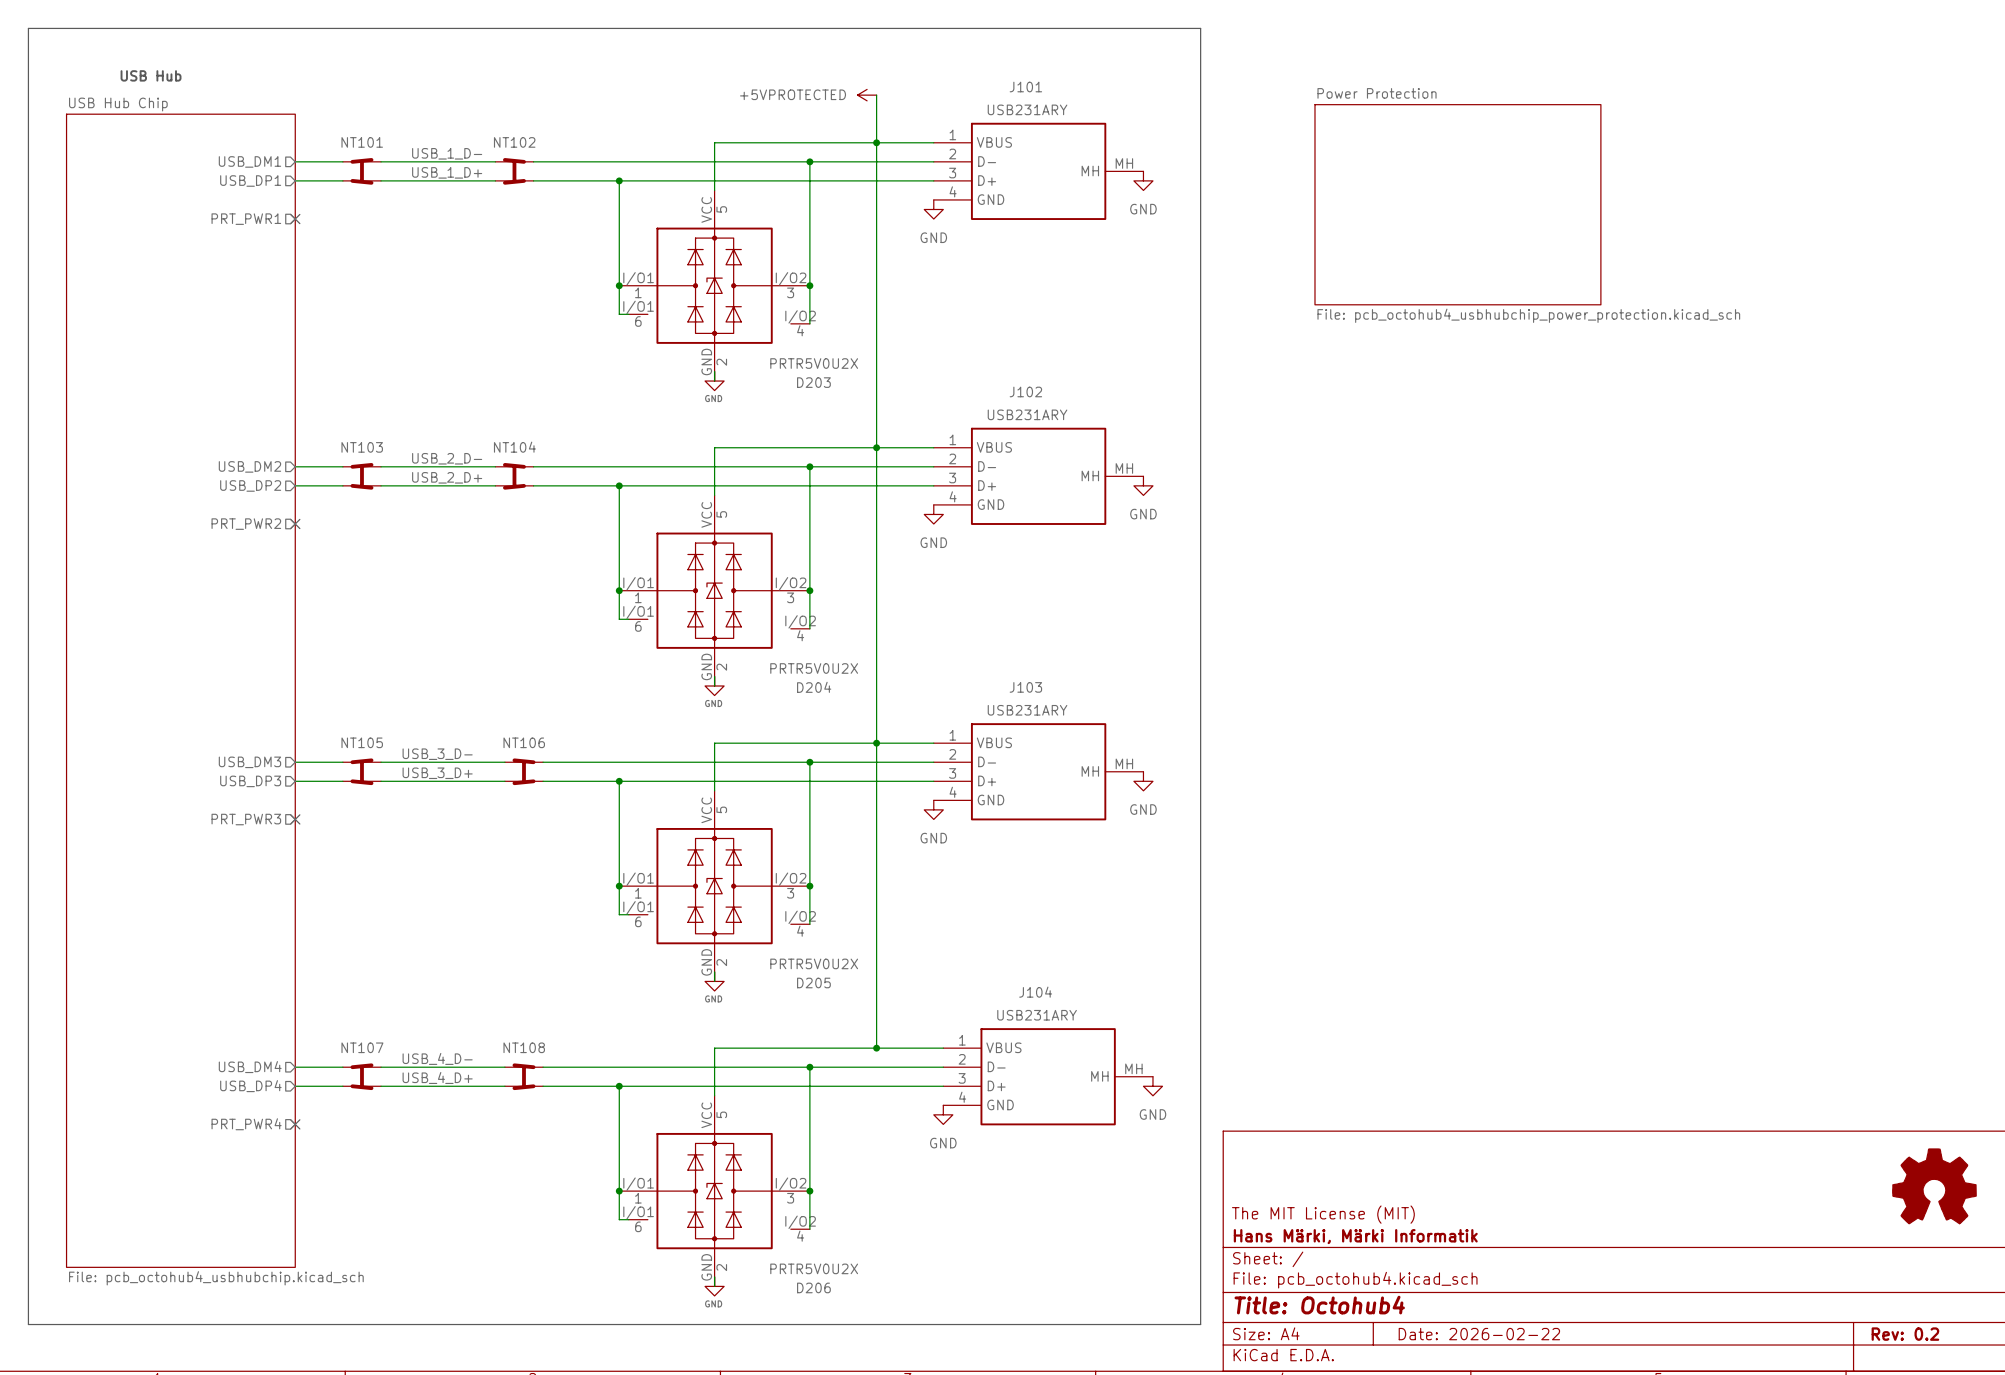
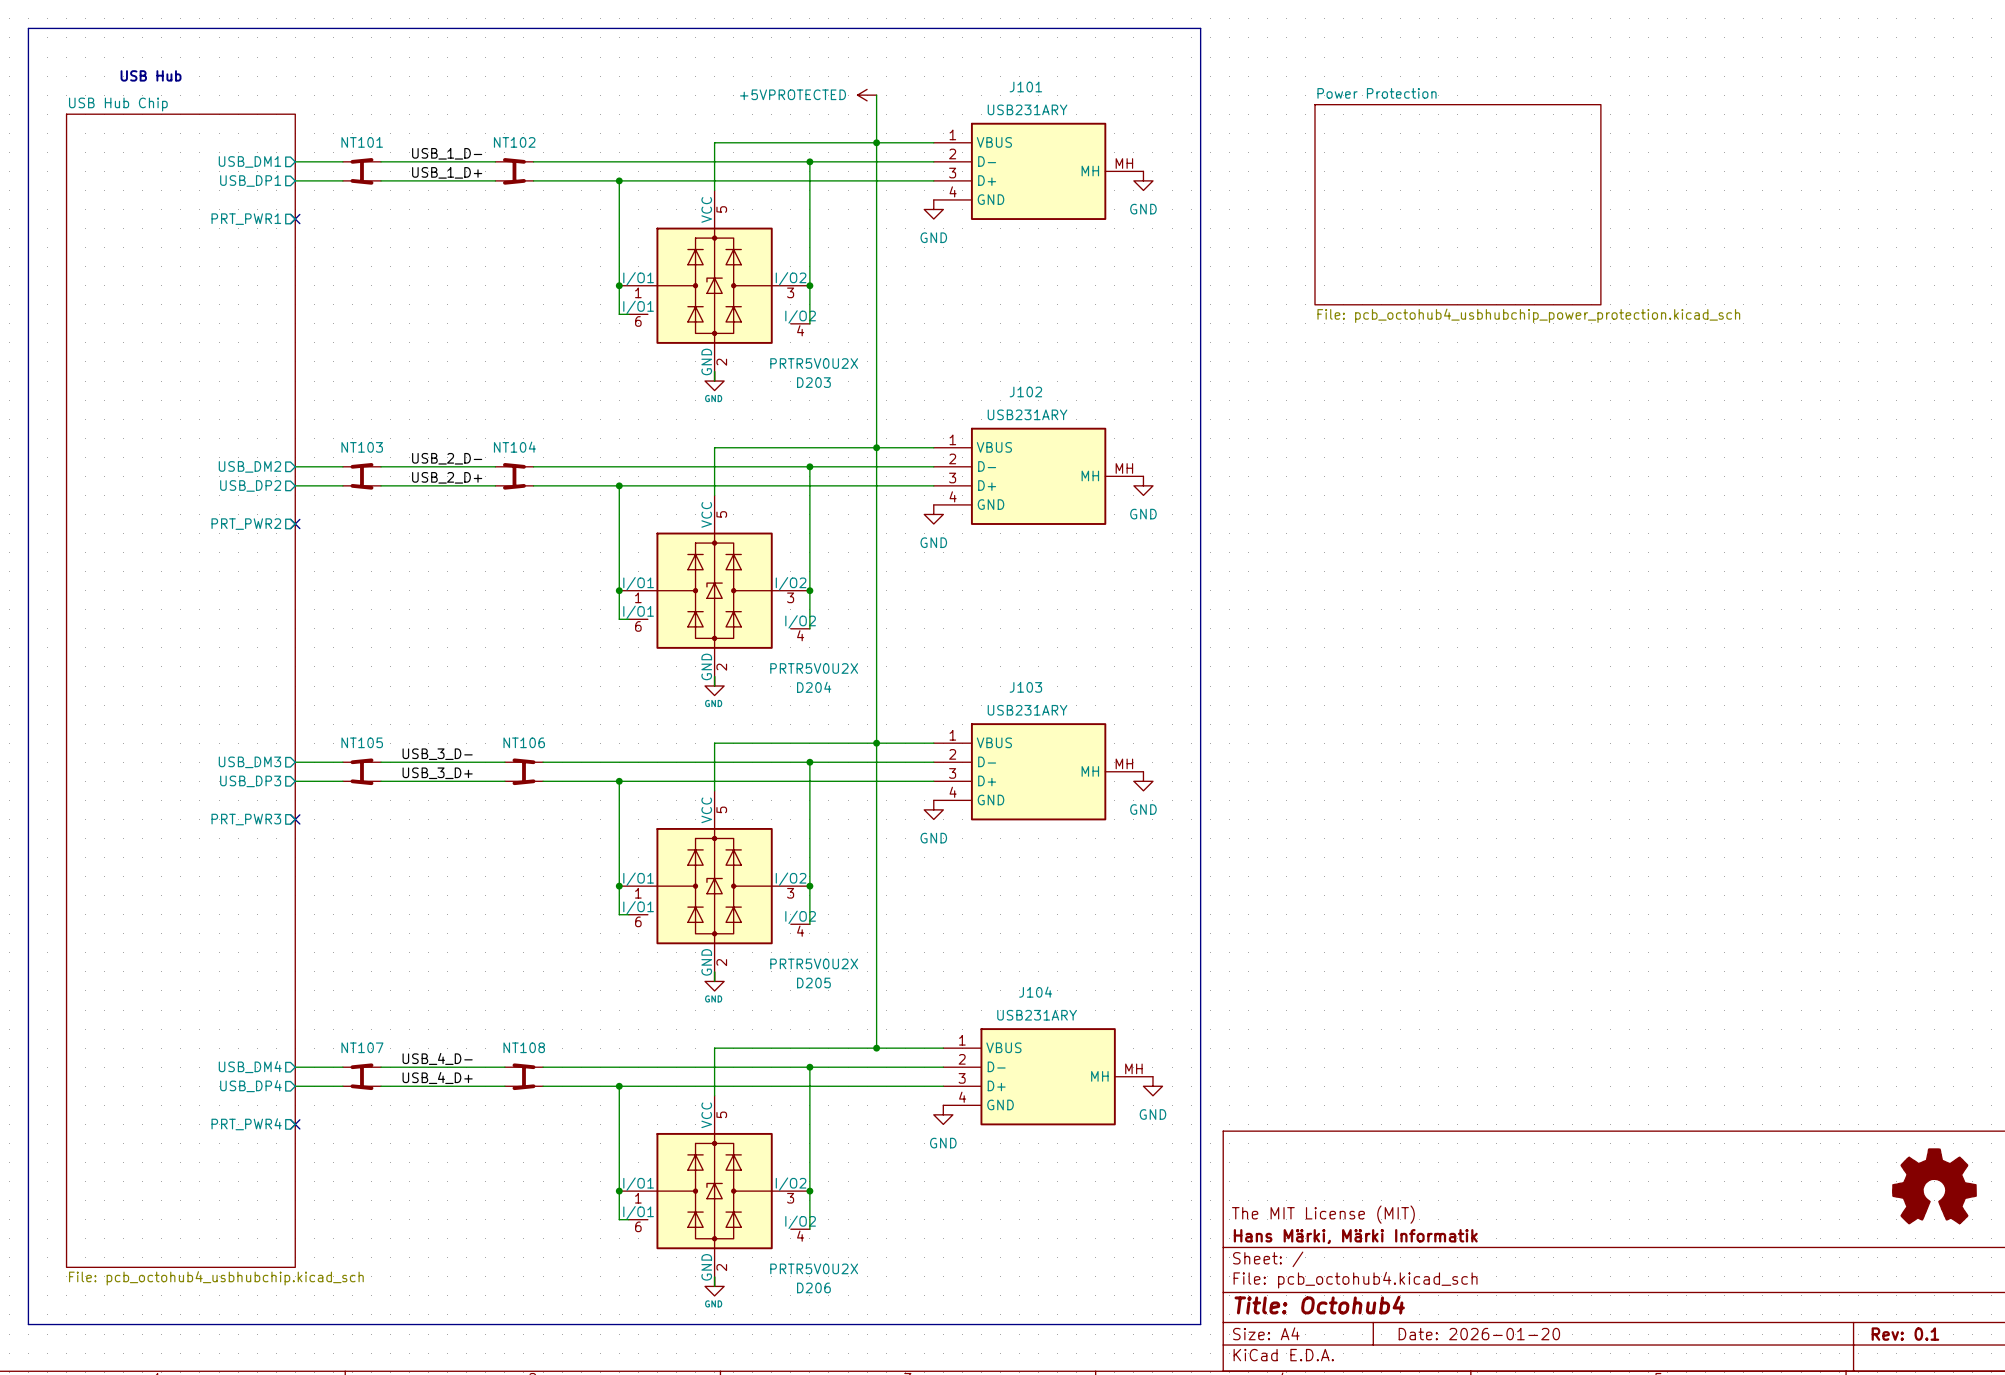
title block: Date: 2026-02-22 (1479, 1334) -> Date: 2026-01-20 (1479, 1334)
title block: Rev: 0.2 (1905, 1334) -> Rev: 0.1 (1905, 1334)

